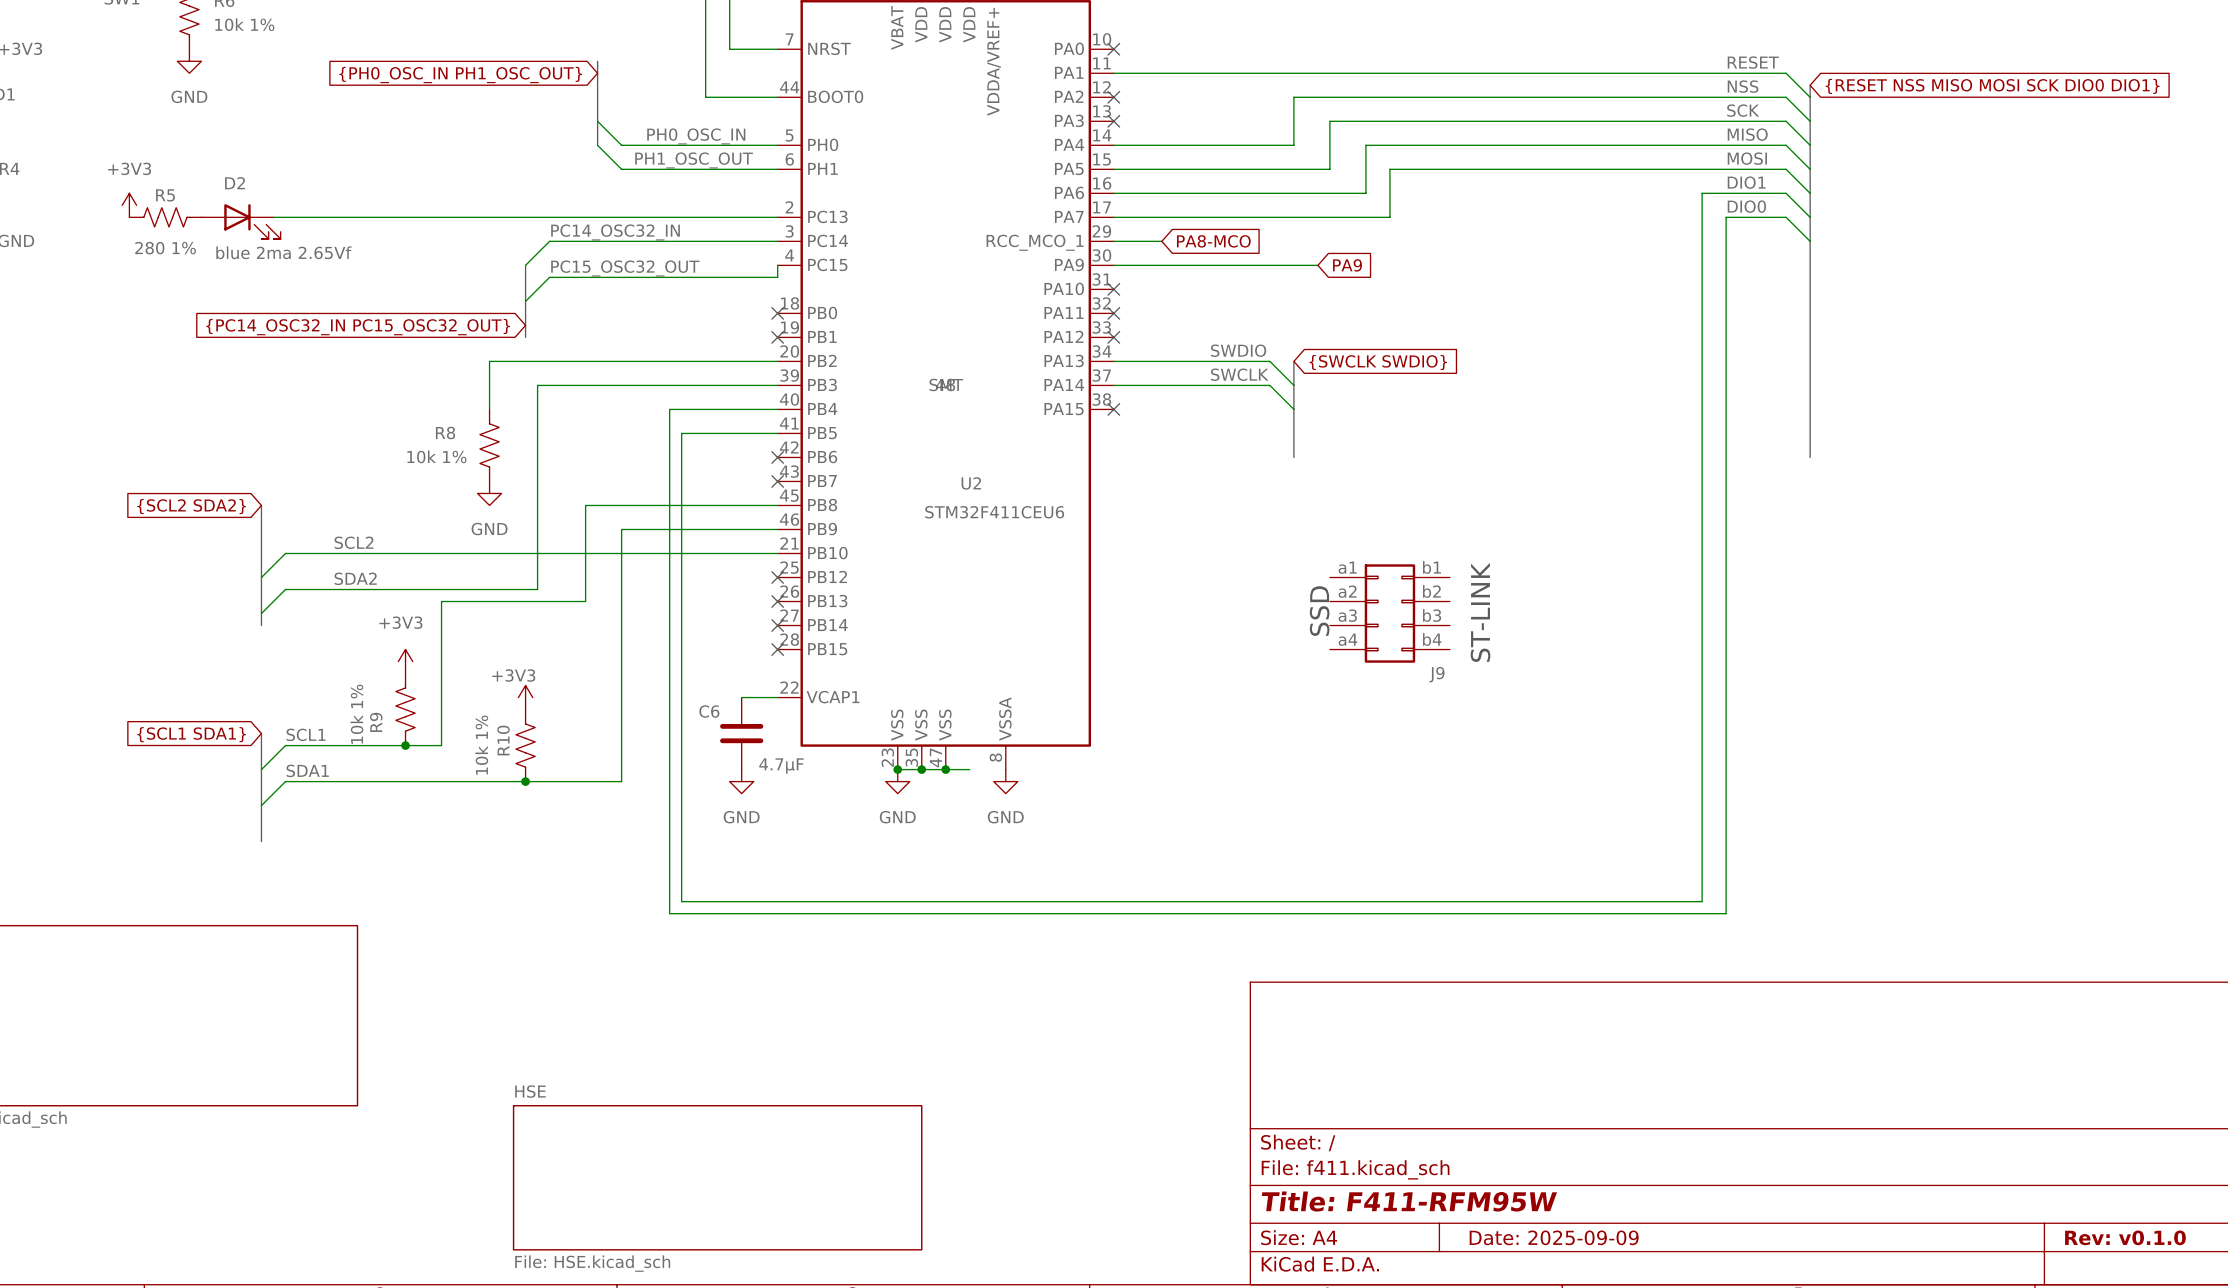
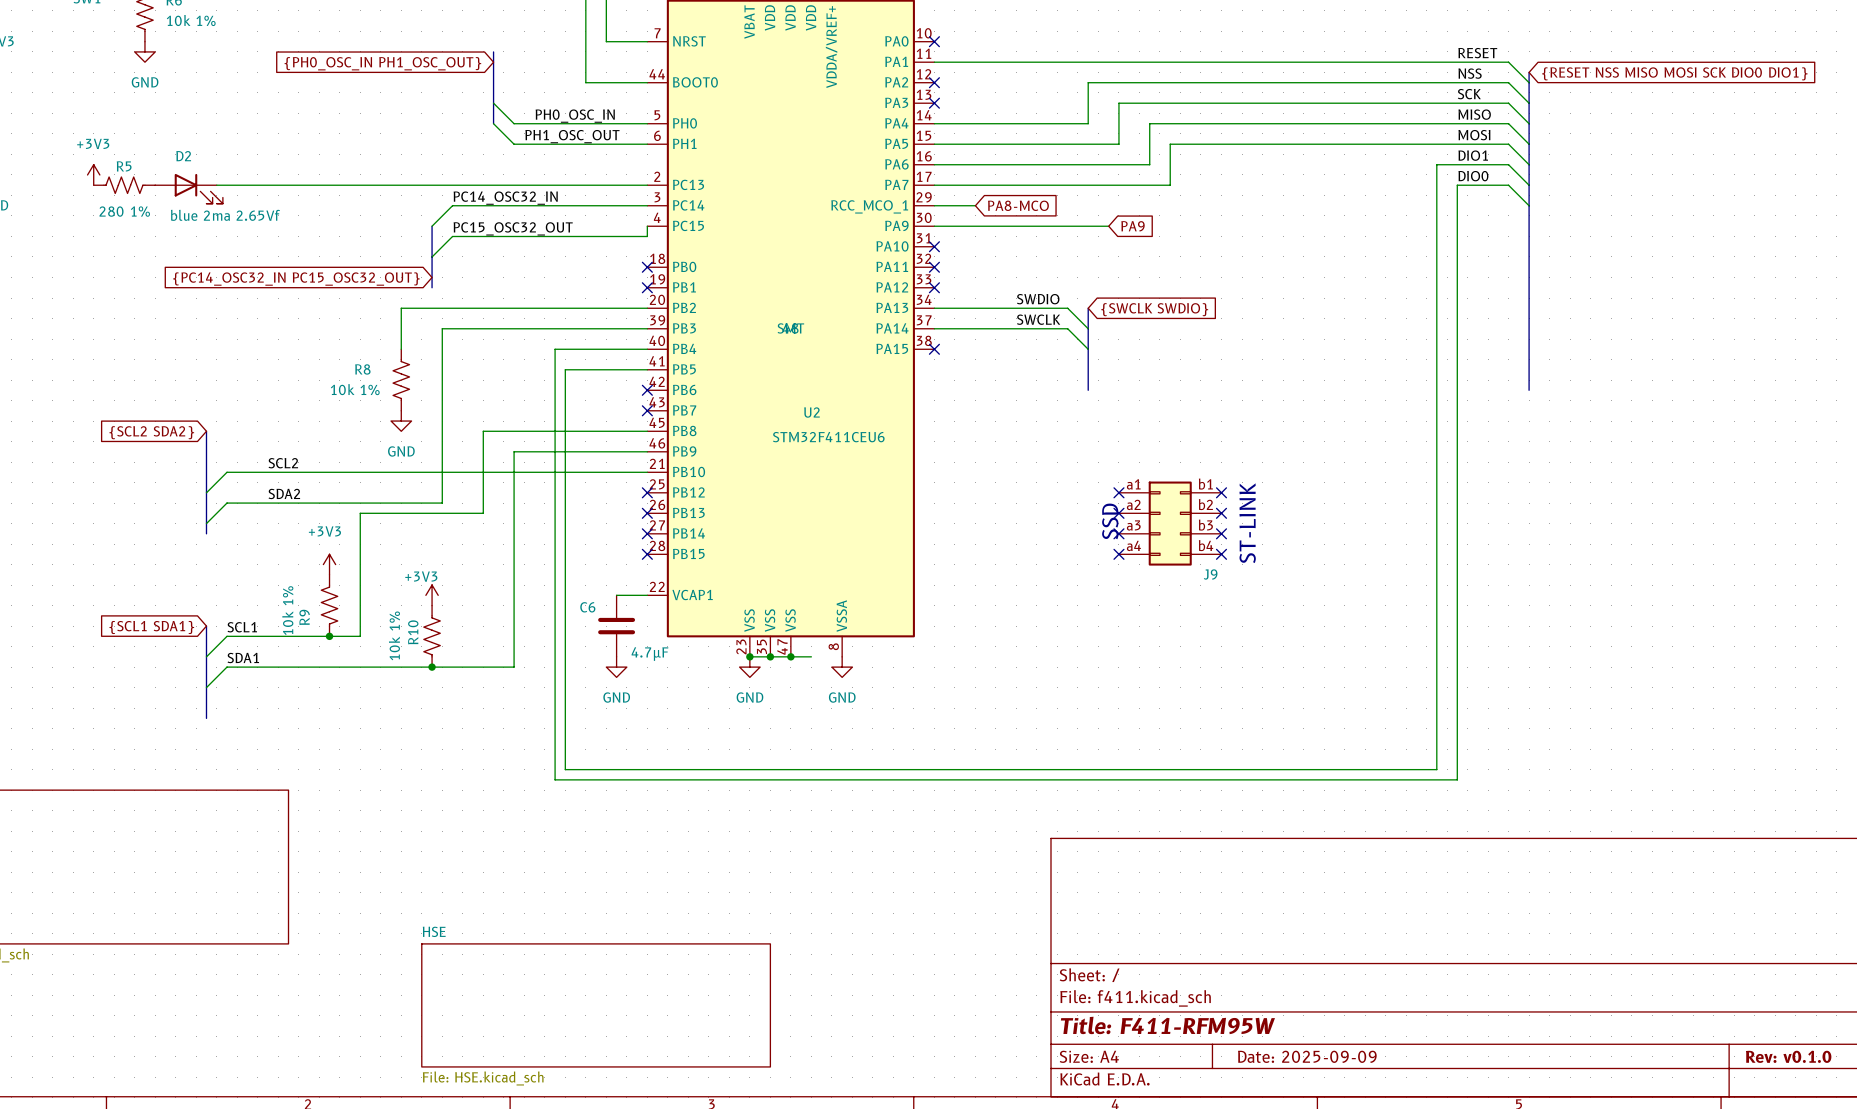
no-connect mark: none -> (1118, 492)
no-connect mark: none -> (1221, 492)
no-connect mark: none -> (1118, 513)
no-connect mark: none -> (1221, 513)
no-connect mark: none -> (1118, 533)
no-connect mark: none -> (1221, 533)
no-connect mark: none -> (1118, 554)
no-connect mark: none -> (1221, 554)

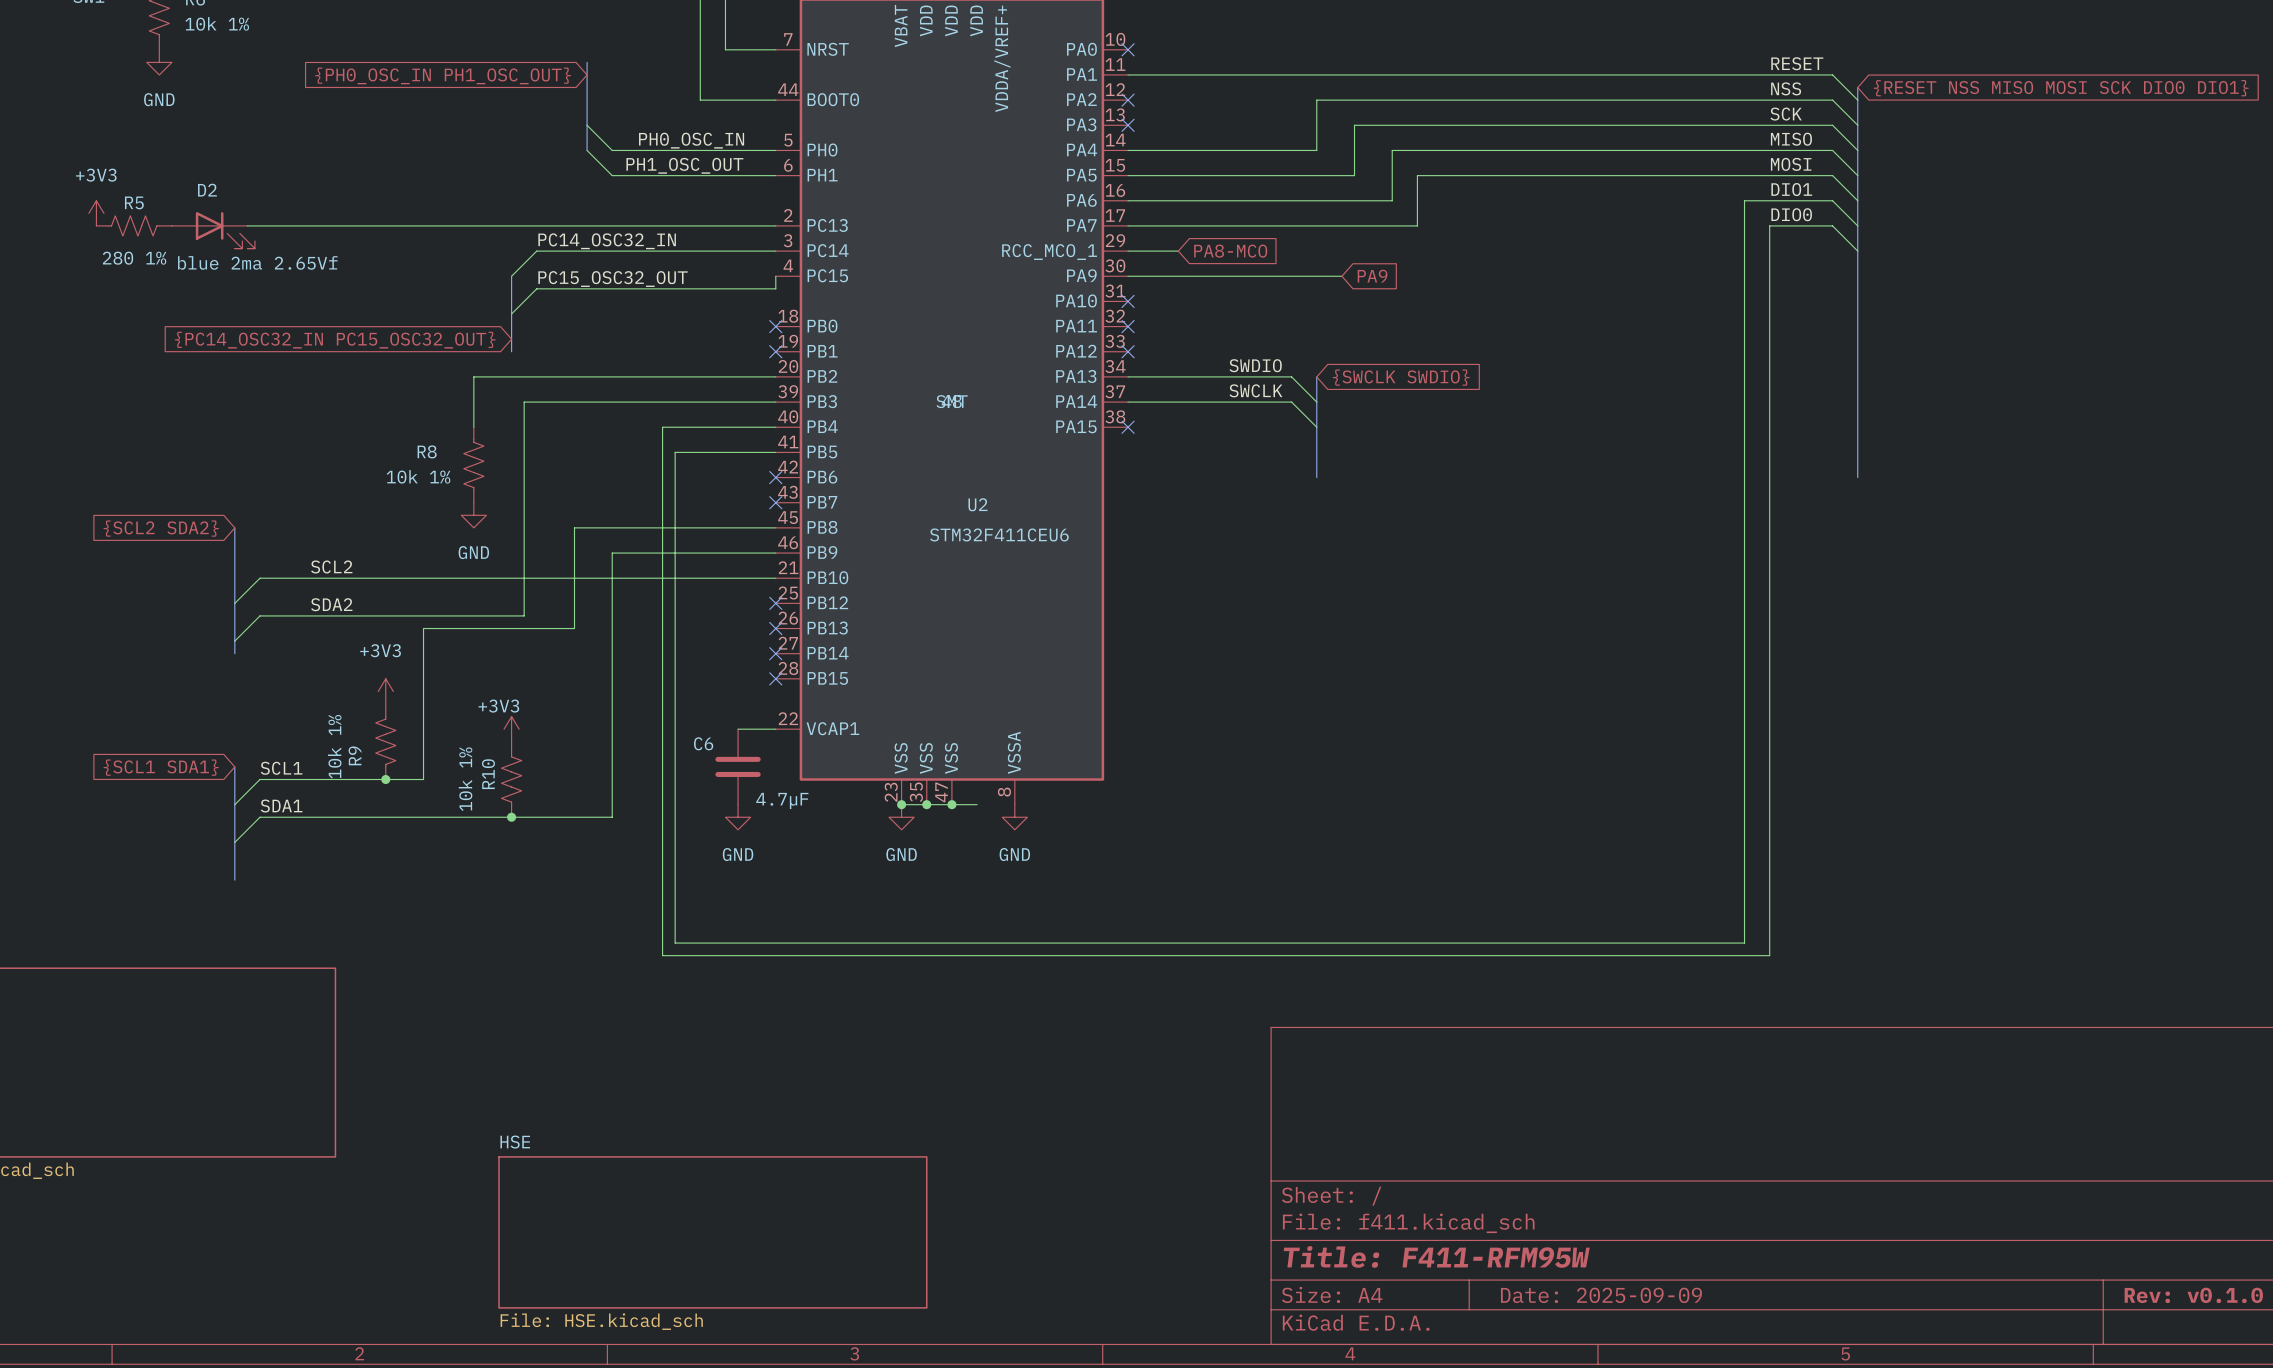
no-connect mark: (1118, 492) -> none
no-connect mark: (1221, 492) -> none
no-connect mark: (1118, 513) -> none
no-connect mark: (1221, 513) -> none
text: SSD (1110, 521) -> none
J9: (1170, 523) -> none
text: ST-LINK (1247, 523) -> none
no-connect mark: (1118, 533) -> none
no-connect mark: (1221, 533) -> none
no-connect mark: (1118, 554) -> none
no-connect mark: (1221, 554) -> none

